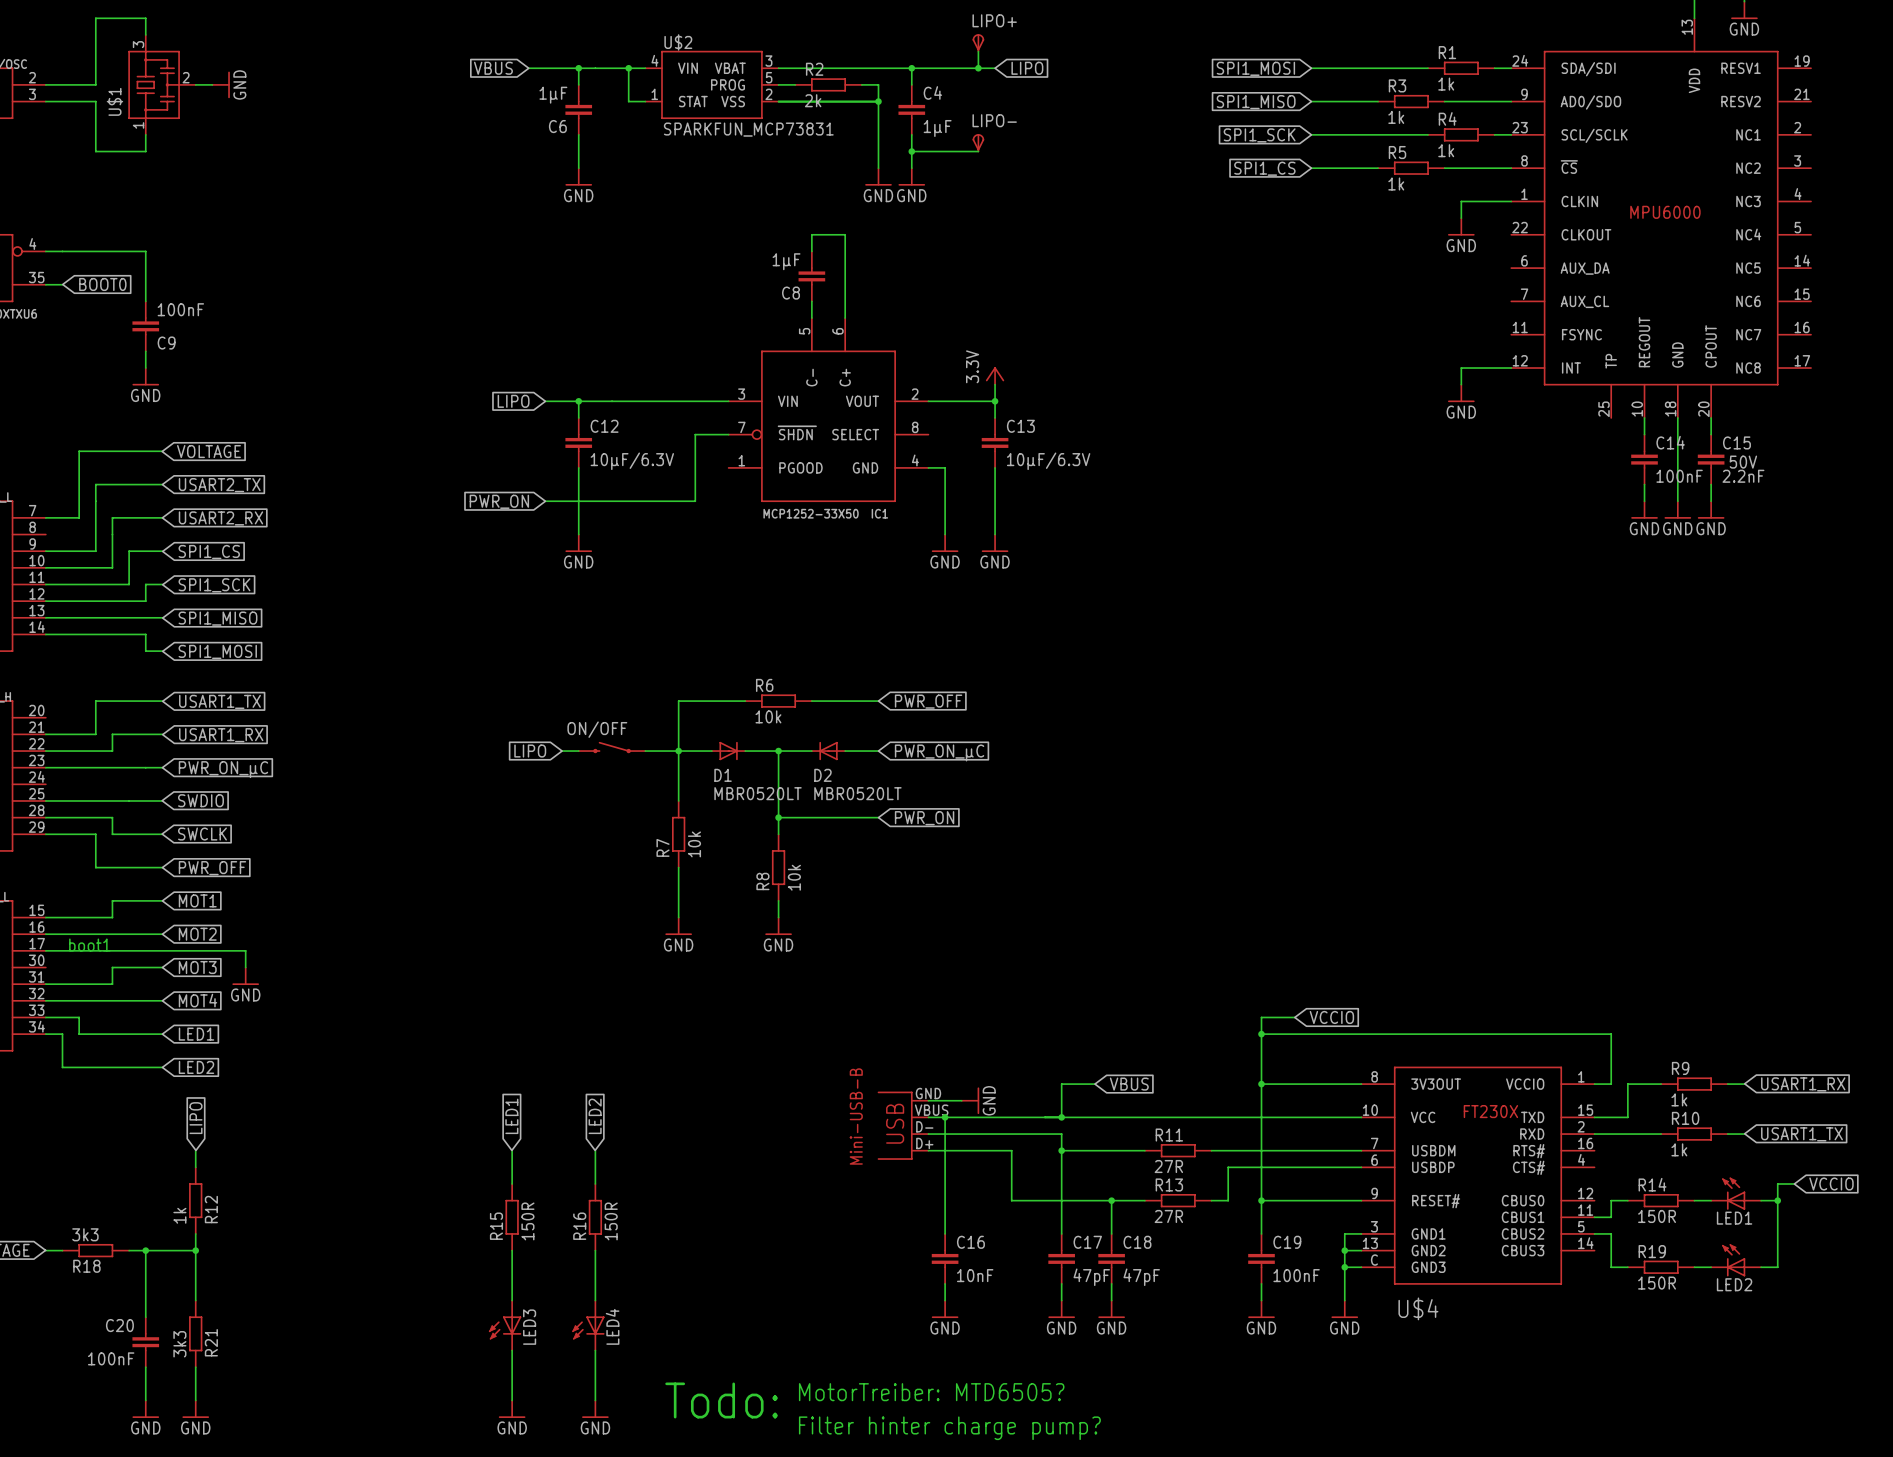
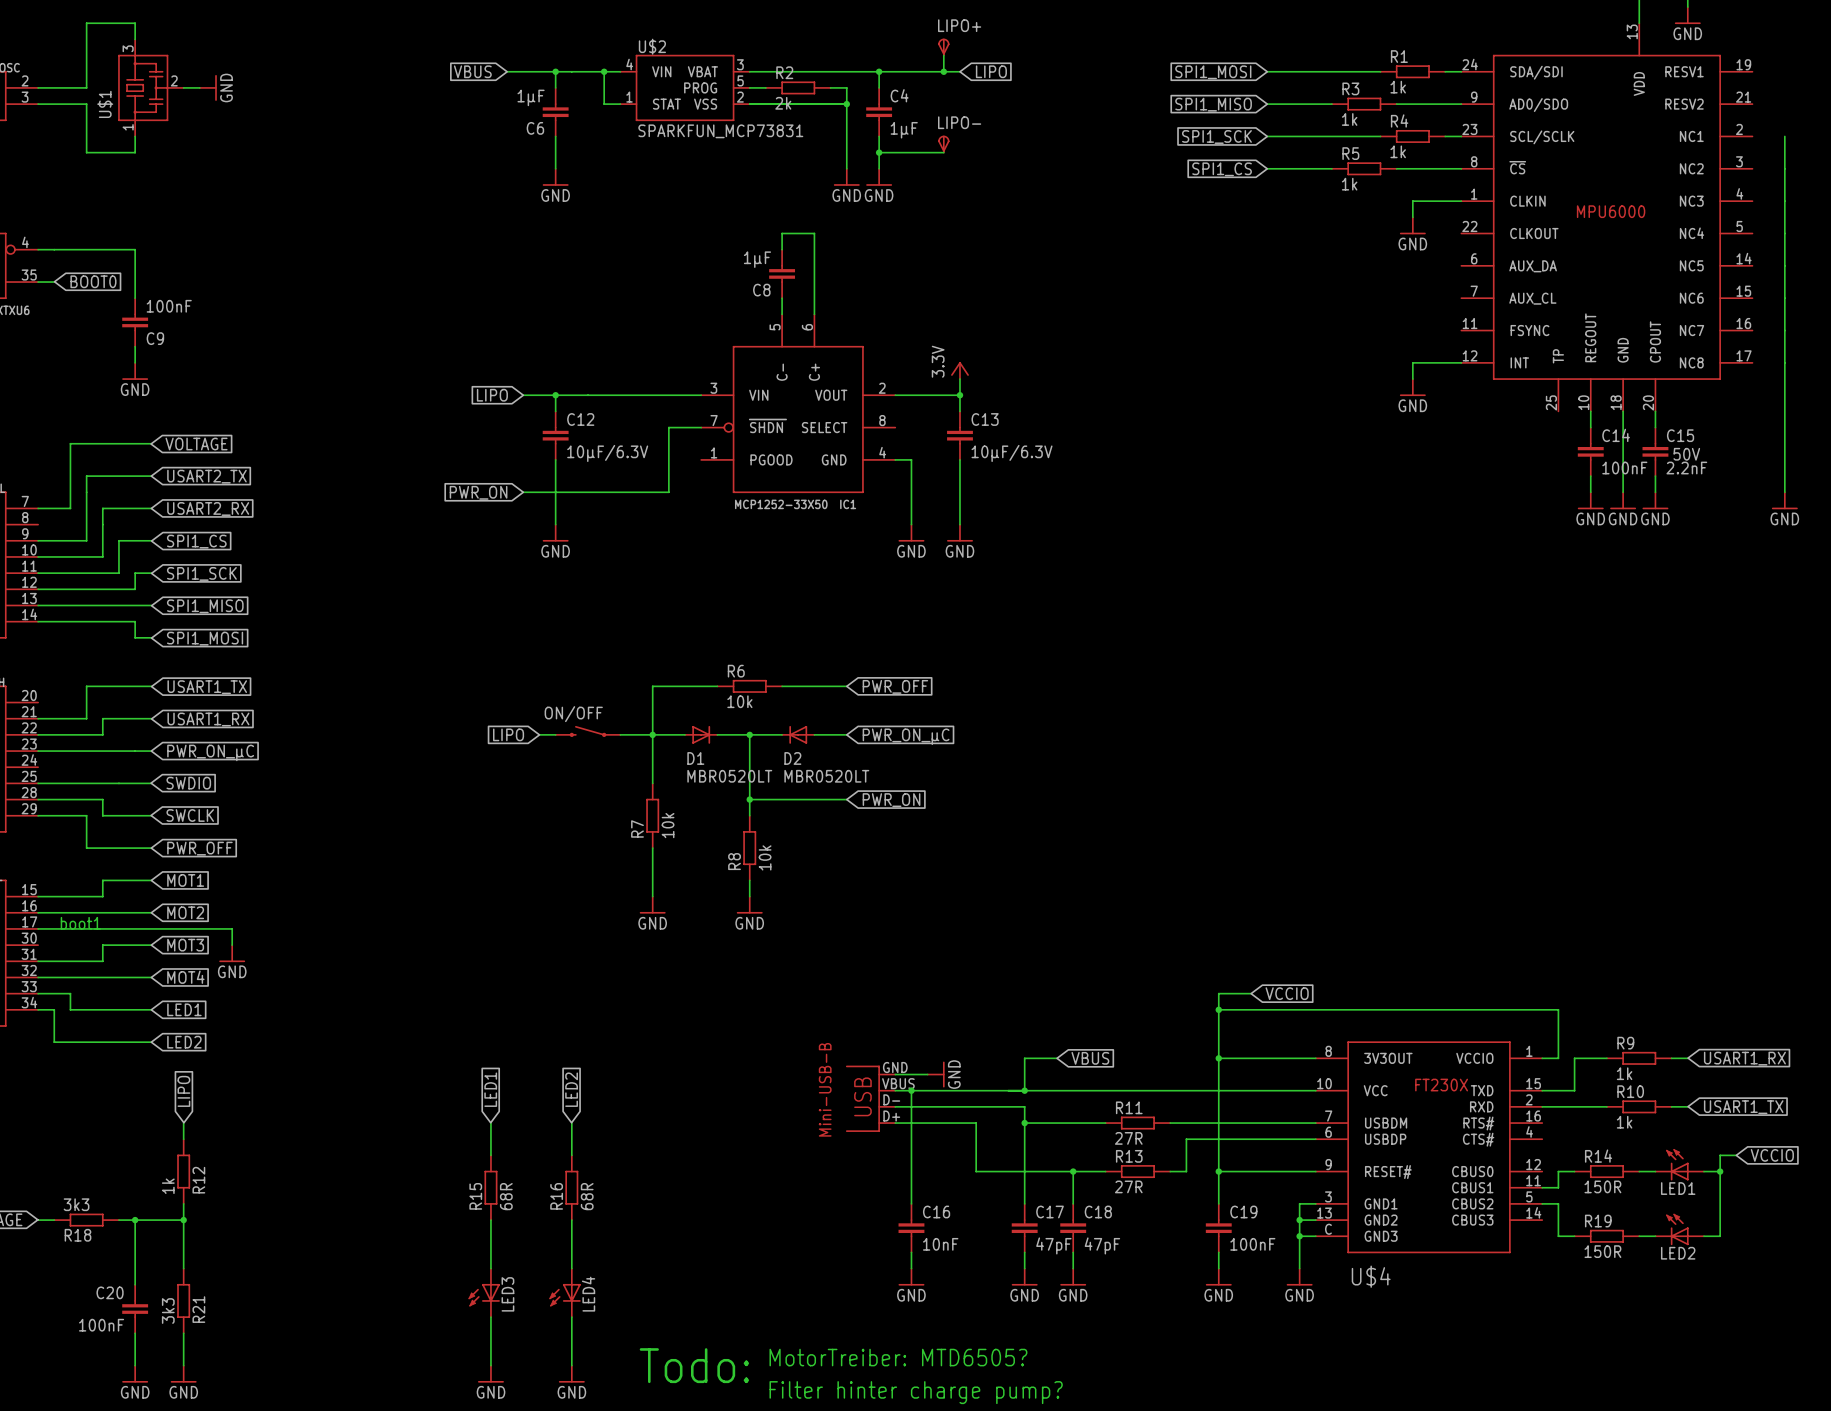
wire: none -> (1784, 136) (1784, 492)
power symbol: none -> GND (1784, 500)
R15 value: 150R (527, 1221) -> 68R (506, 1196)
R16 value: 150R (611, 1221) -> 68R (587, 1196)

